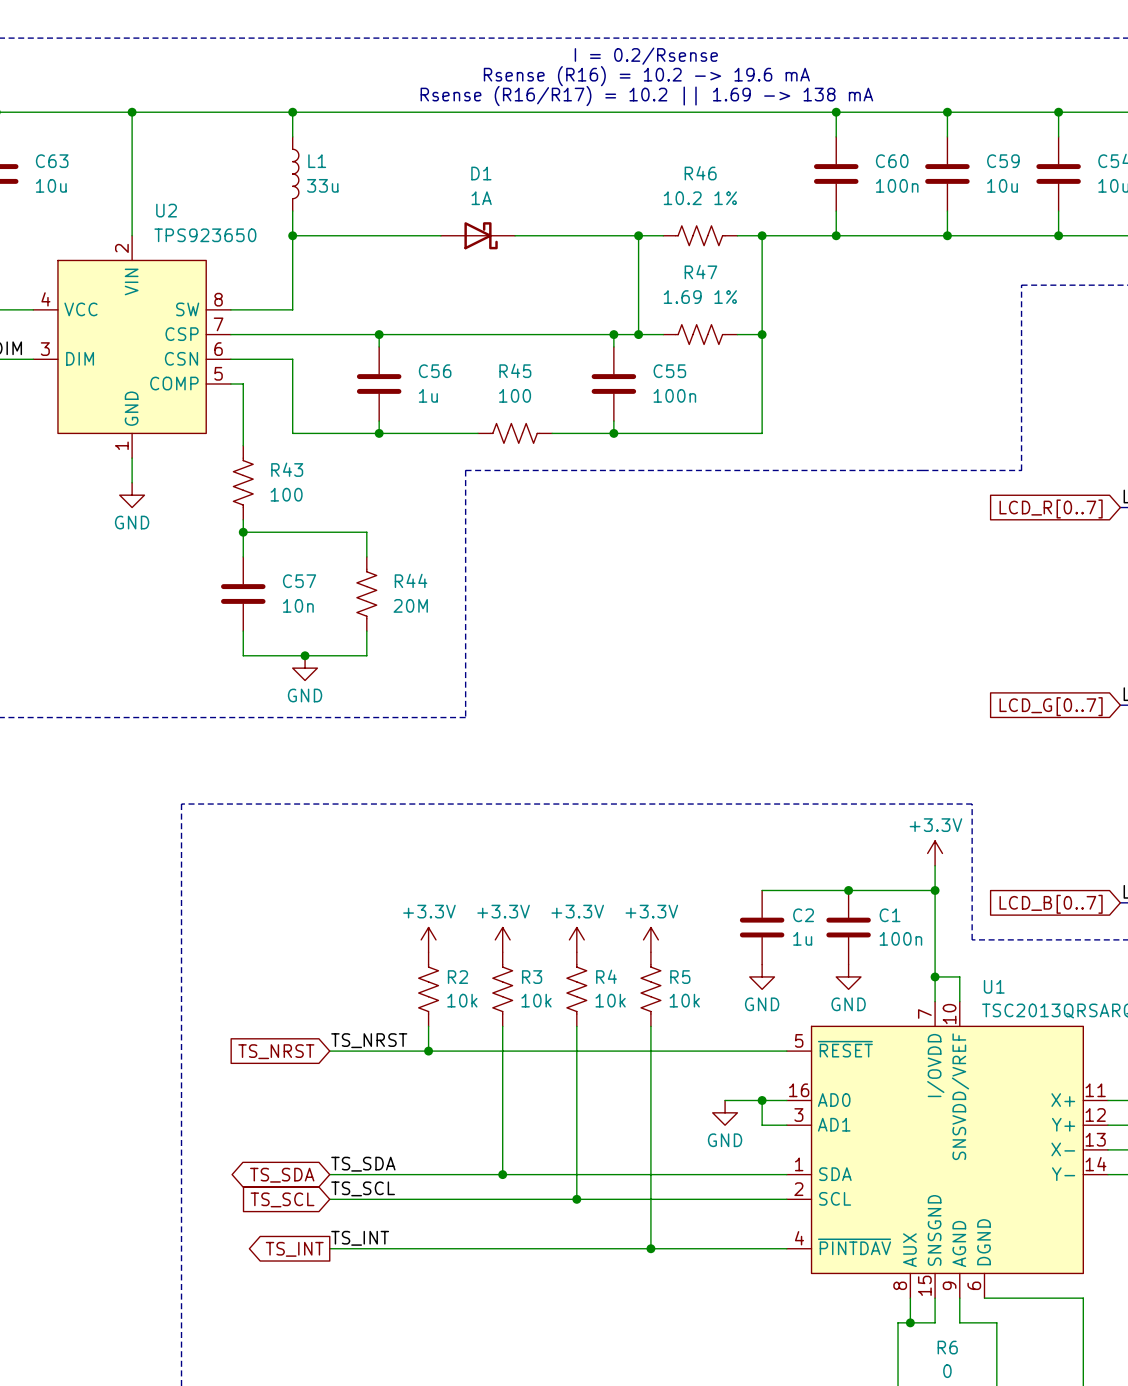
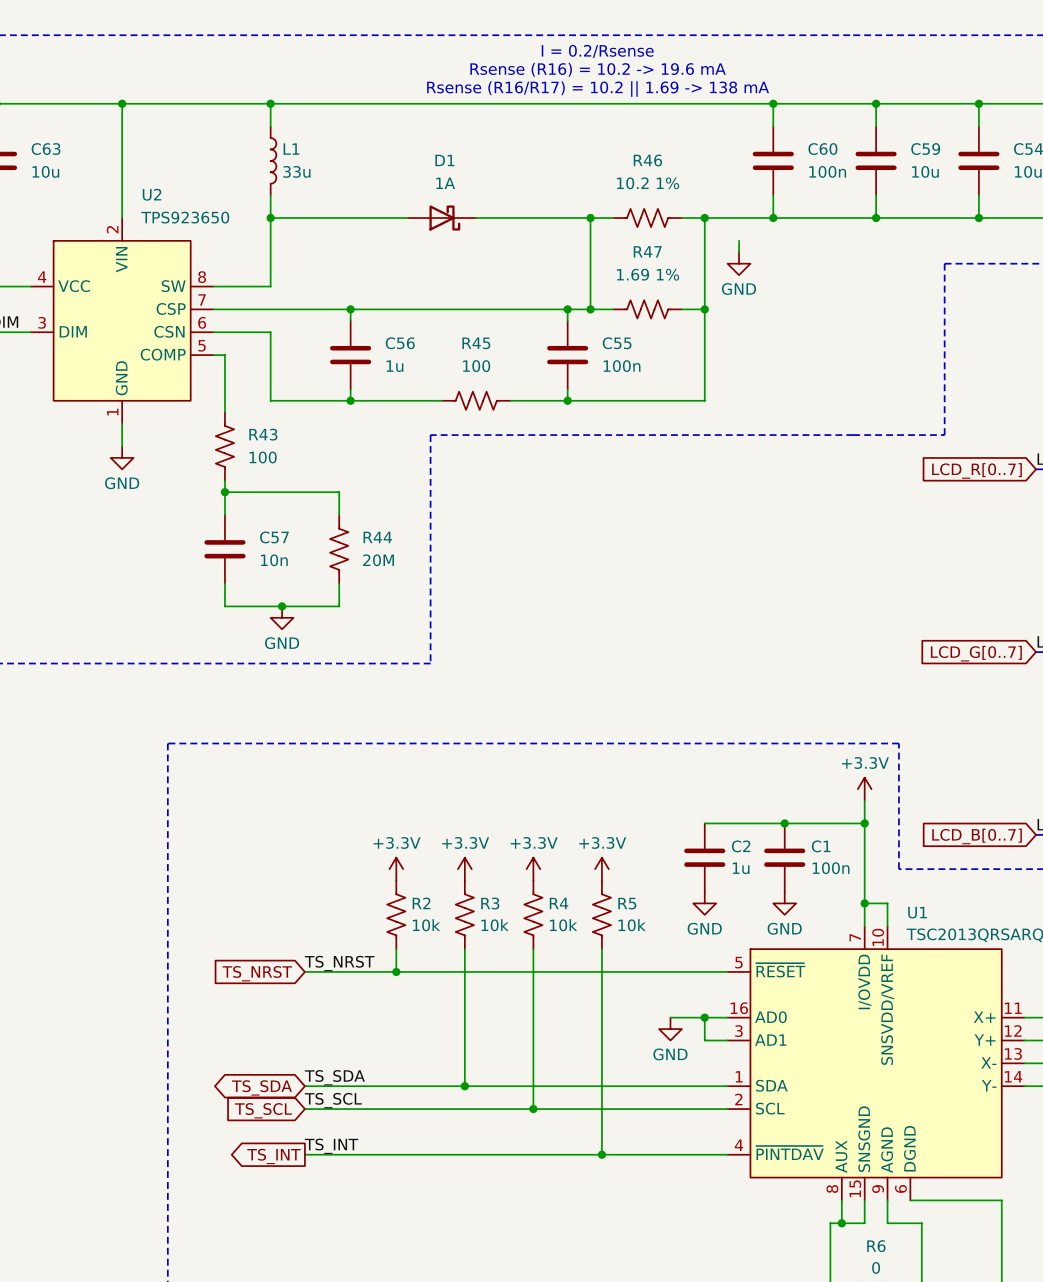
wire: none -> (739, 240) (739, 252)
power symbol: none -> GND (739, 263)

